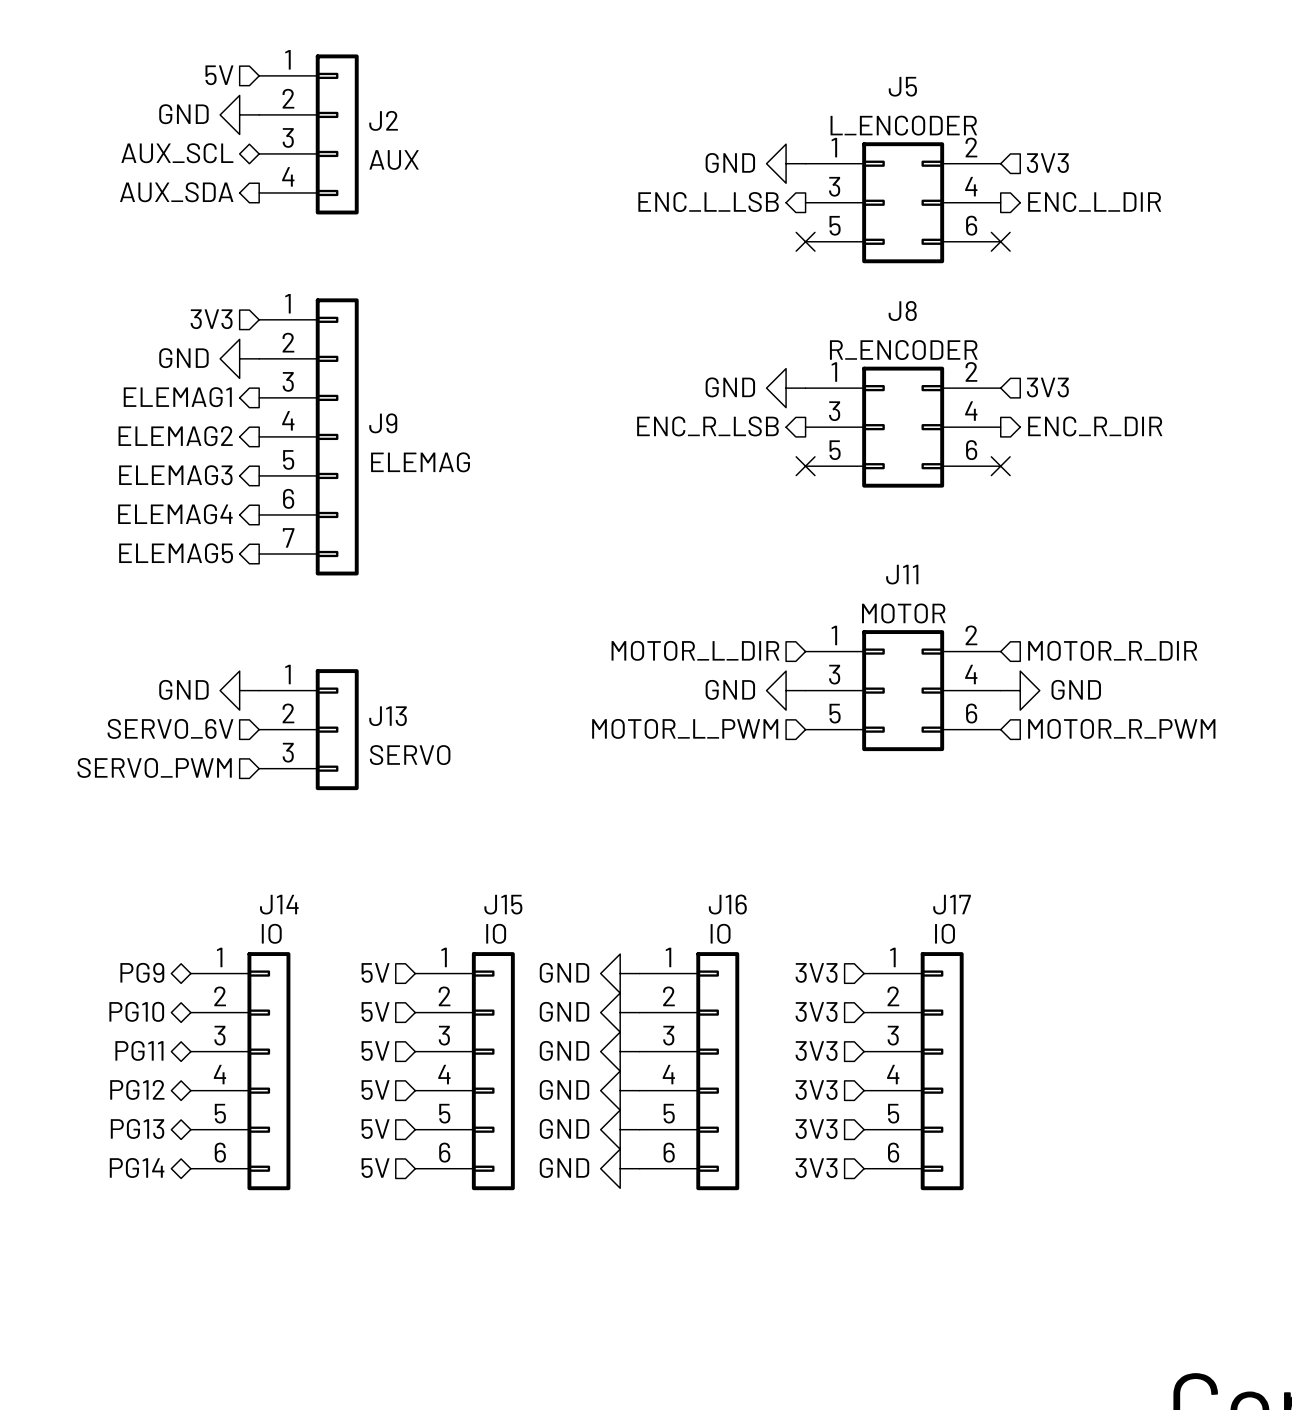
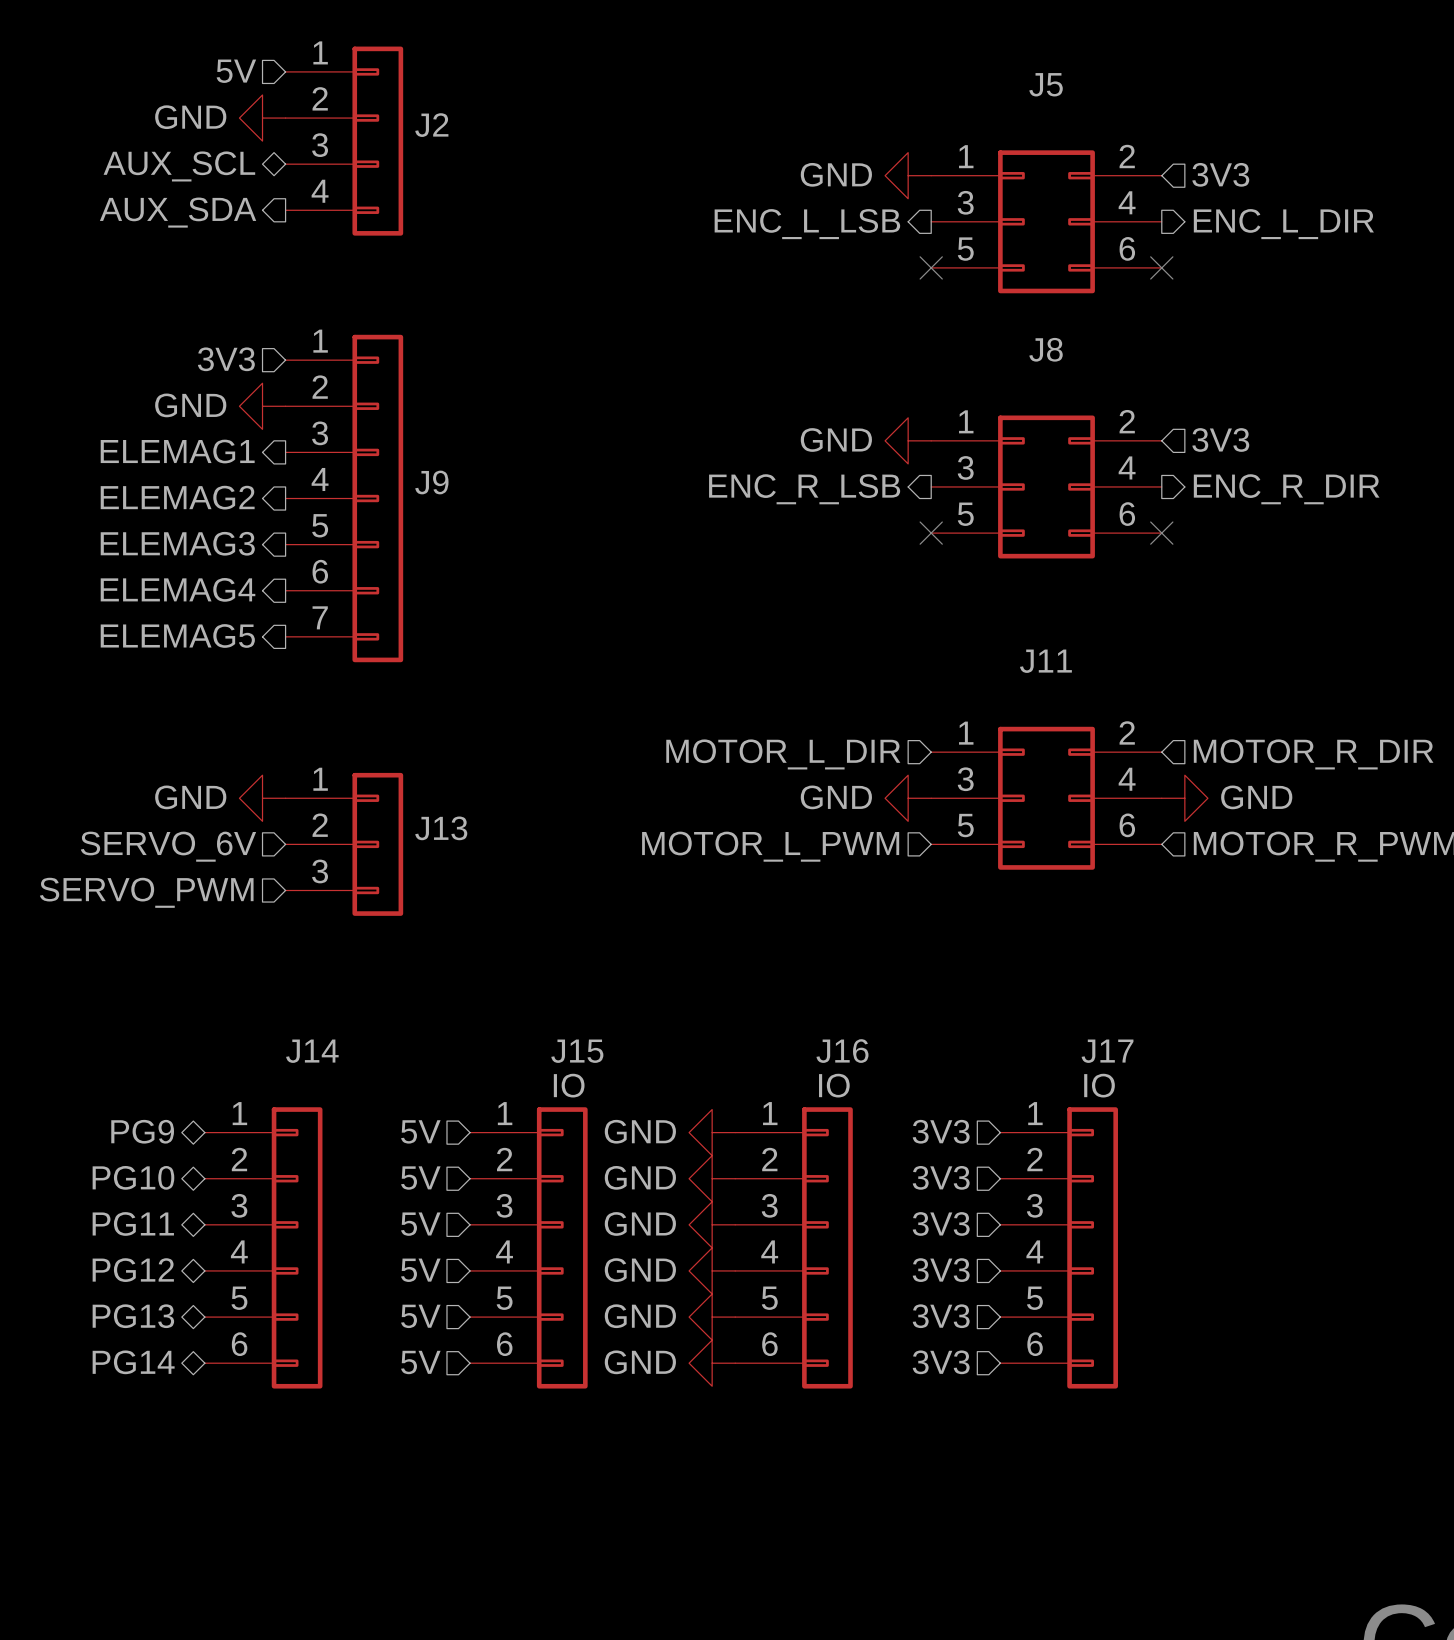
J5 value: L_ENCODER (903, 125) -> none
J2 value: AUX (394, 159) -> none
J8 value: R_ENCODER (903, 350) -> none
J9 value: ELEMAG (420, 462) -> none
J11 value: MOTOR (903, 613) -> none
J13 value: SERVO (410, 755) -> none
J14 value: IO (271, 933) -> none

